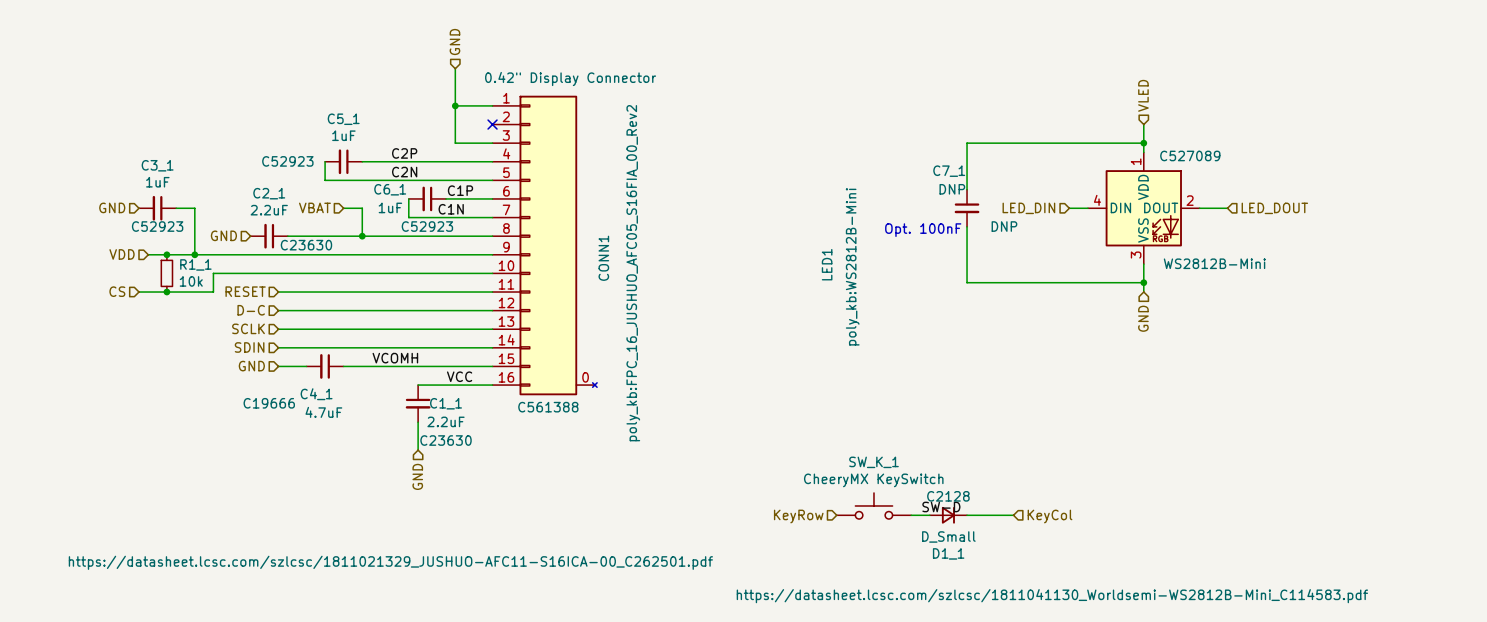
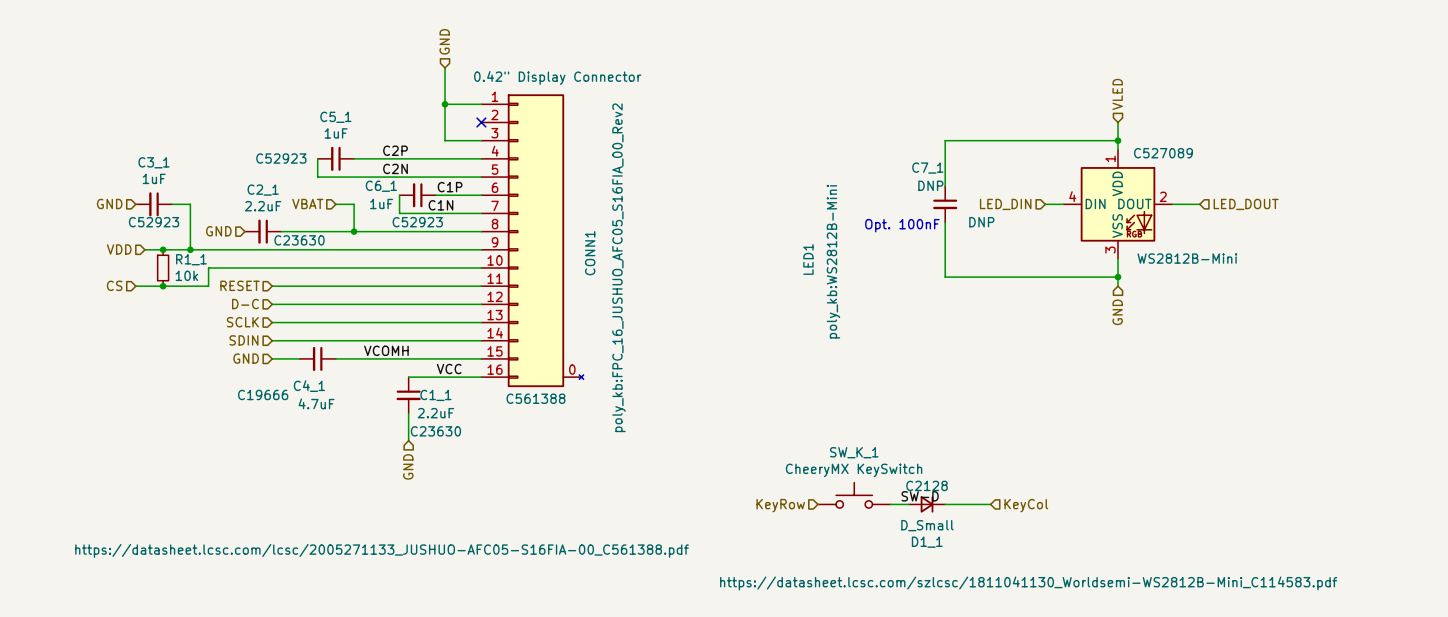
CONN1 text: https://datasheet.lcsc.com/szlcsc/1811021329_JUSHUO-AFC11-S16ICA-00_C262501.pdf (390, 562) -> https://datasheet.lcsc.com/lcsc/2005271133_JUSHUO-AFC05-S16FIA-00_C561388.pdf (382, 550)

